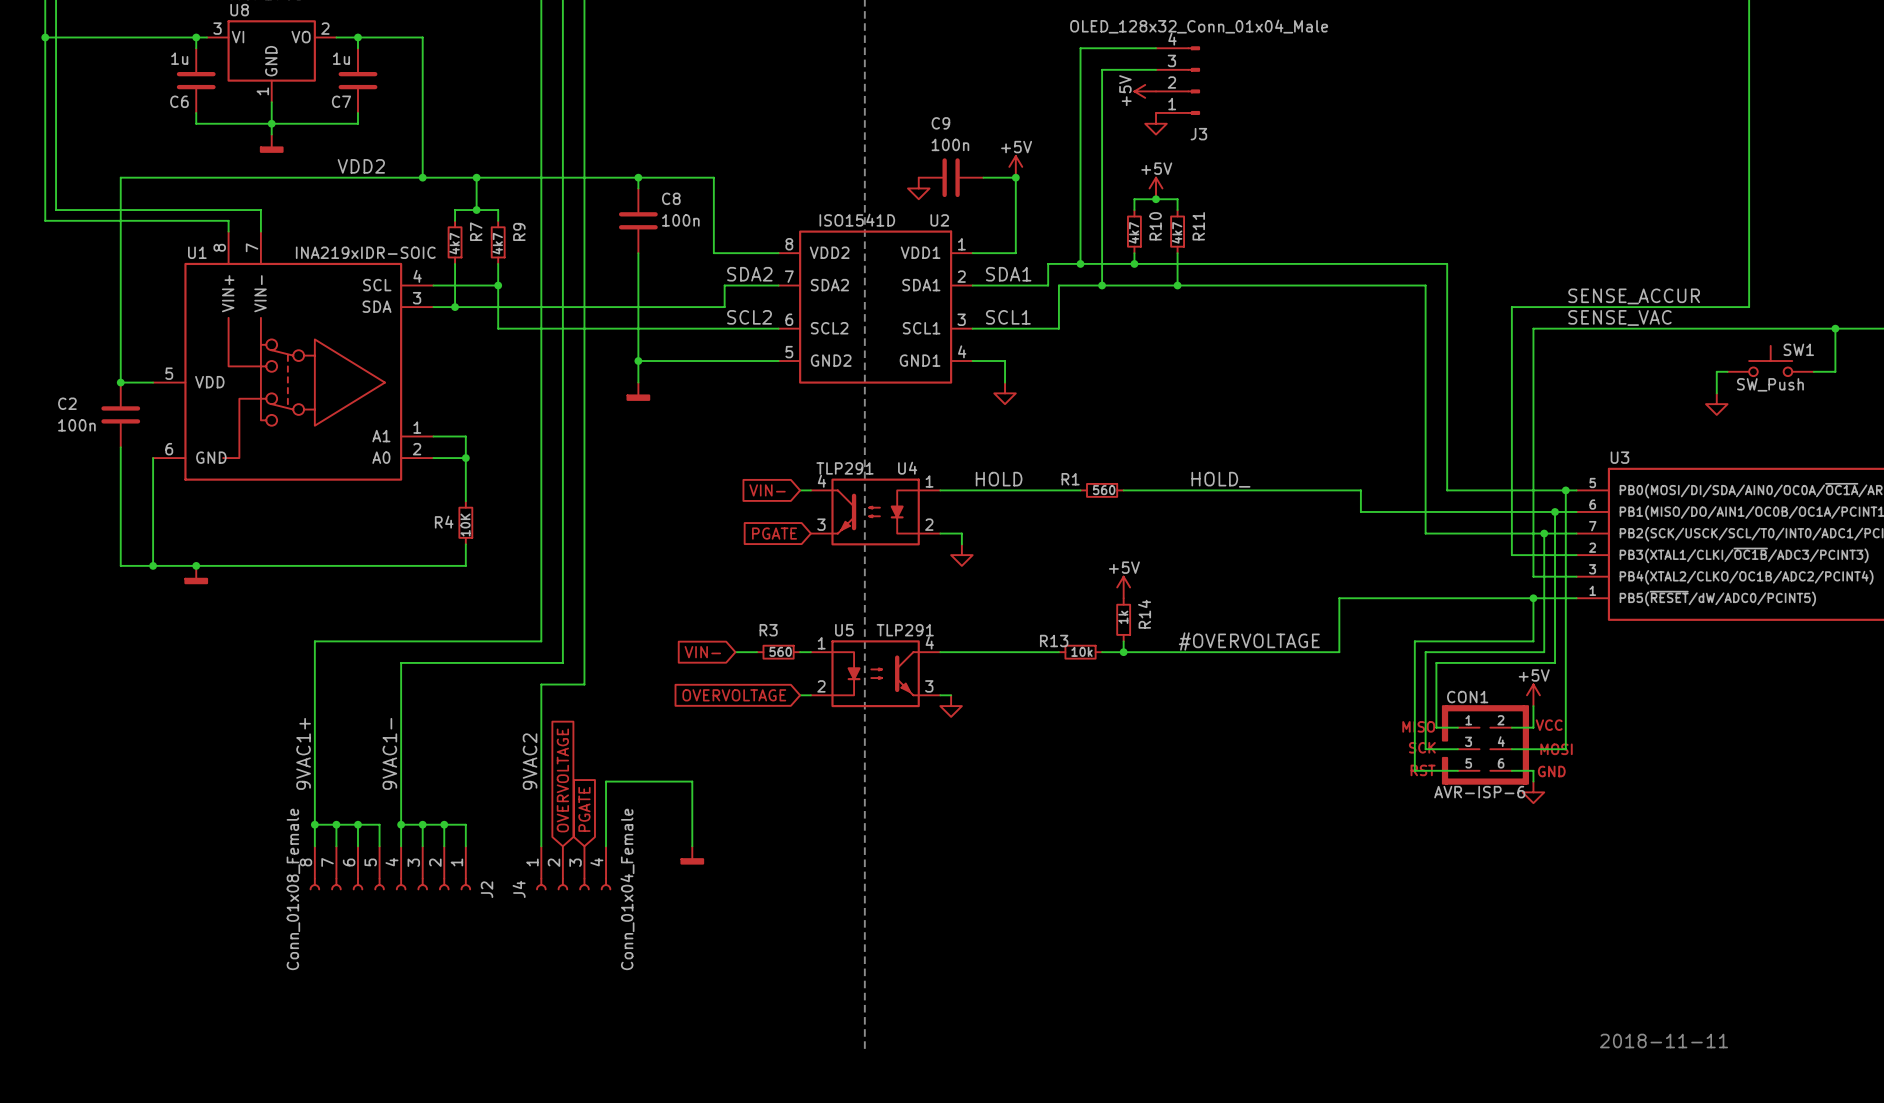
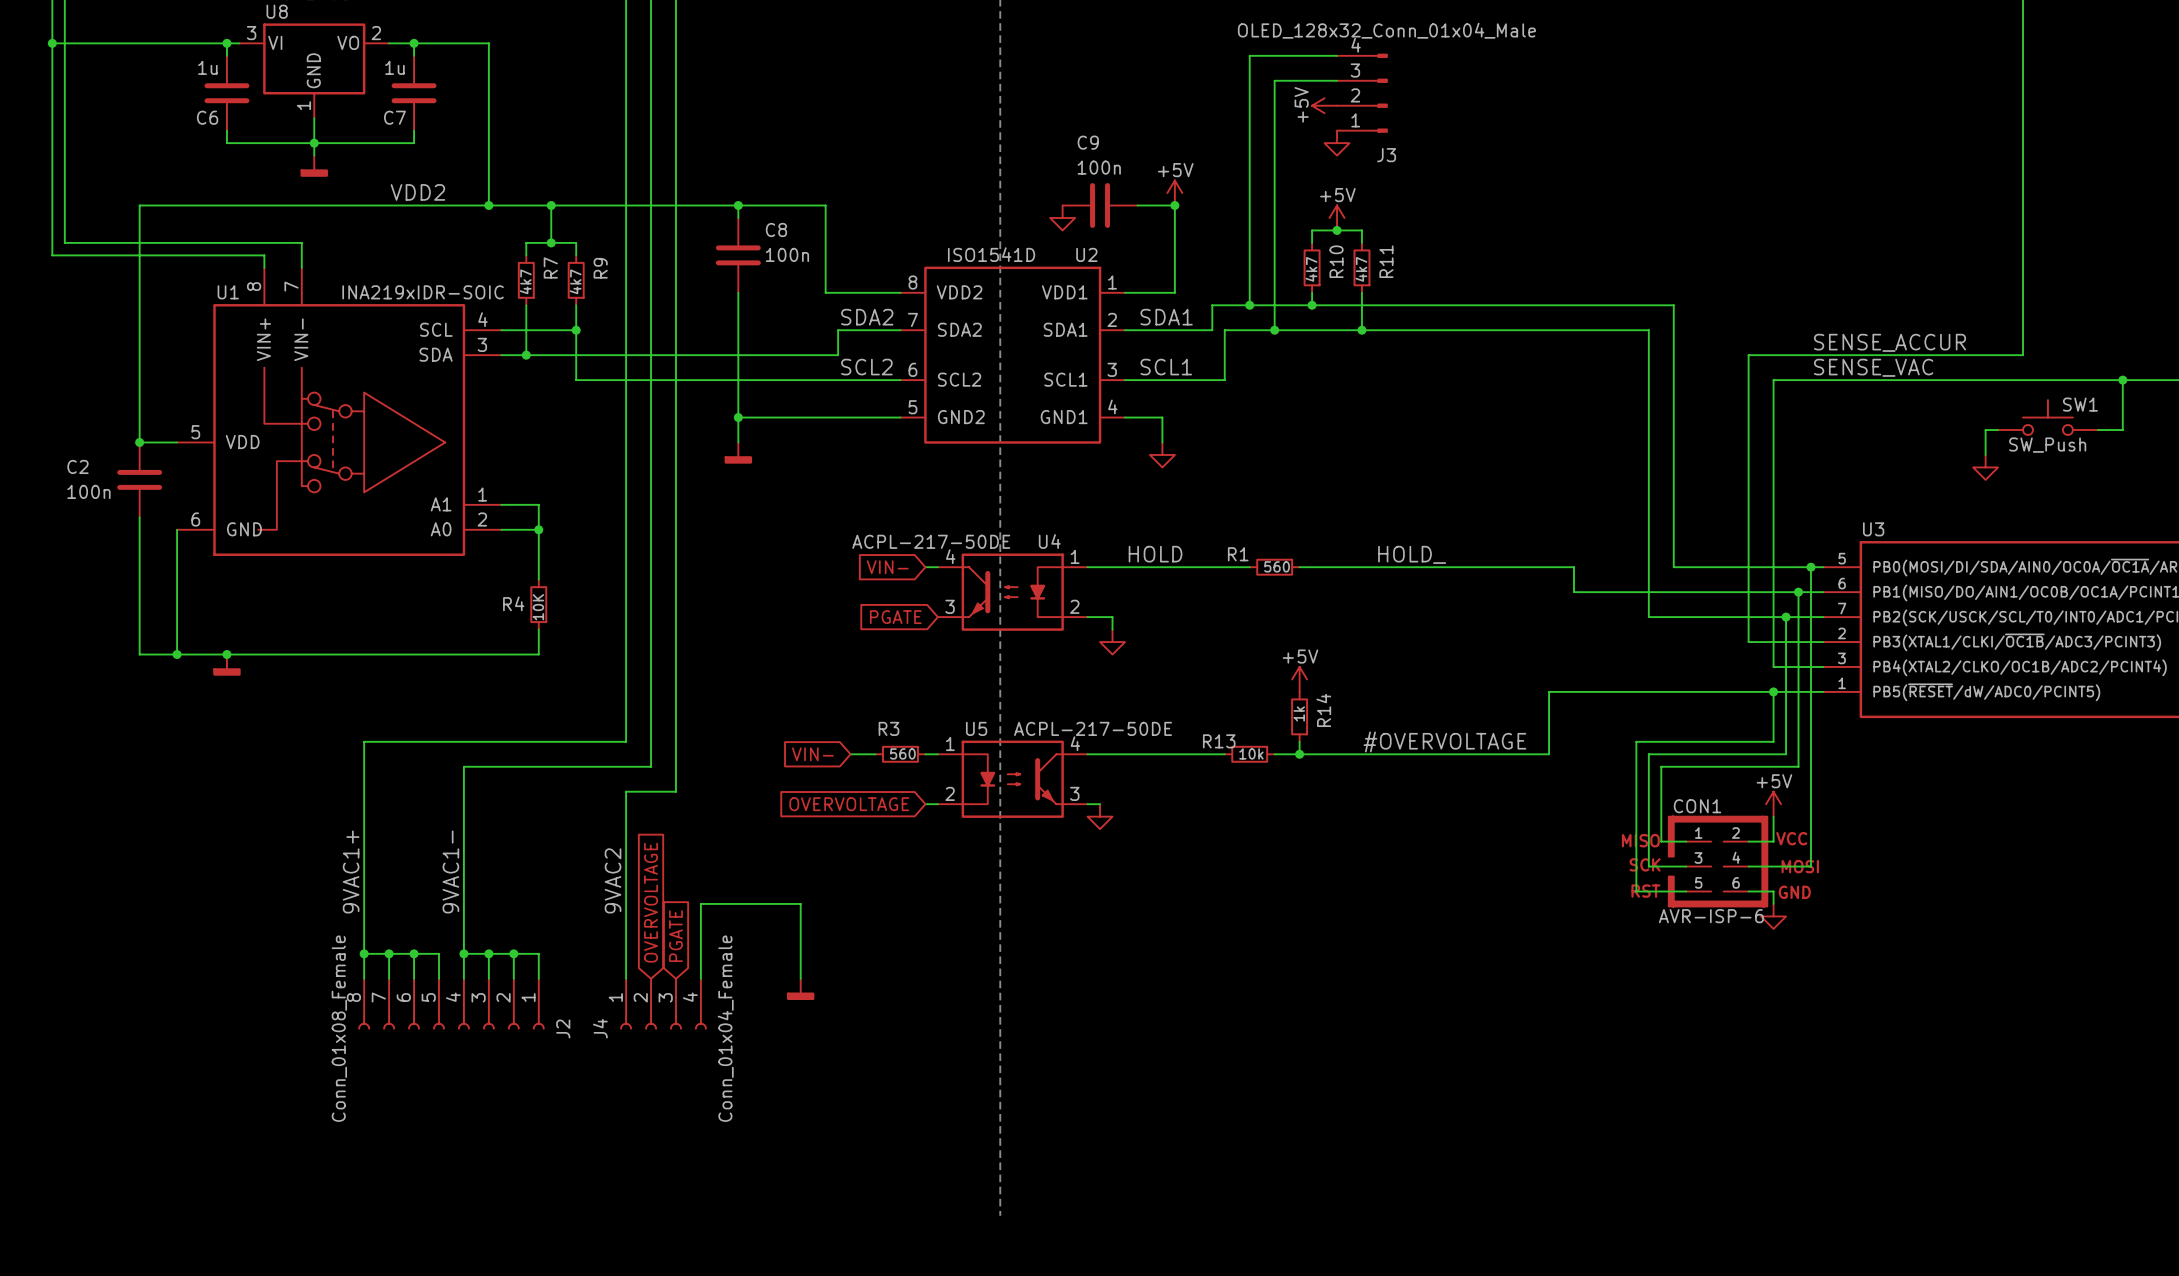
U4 value: TLP291 (844, 468) -> ACPL-217-50DE (931, 541)
U5 value: TLP291 (905, 630) -> ACPL-217-50DE (1093, 728)
text: 2018-11-11 (1664, 1041) -> none

